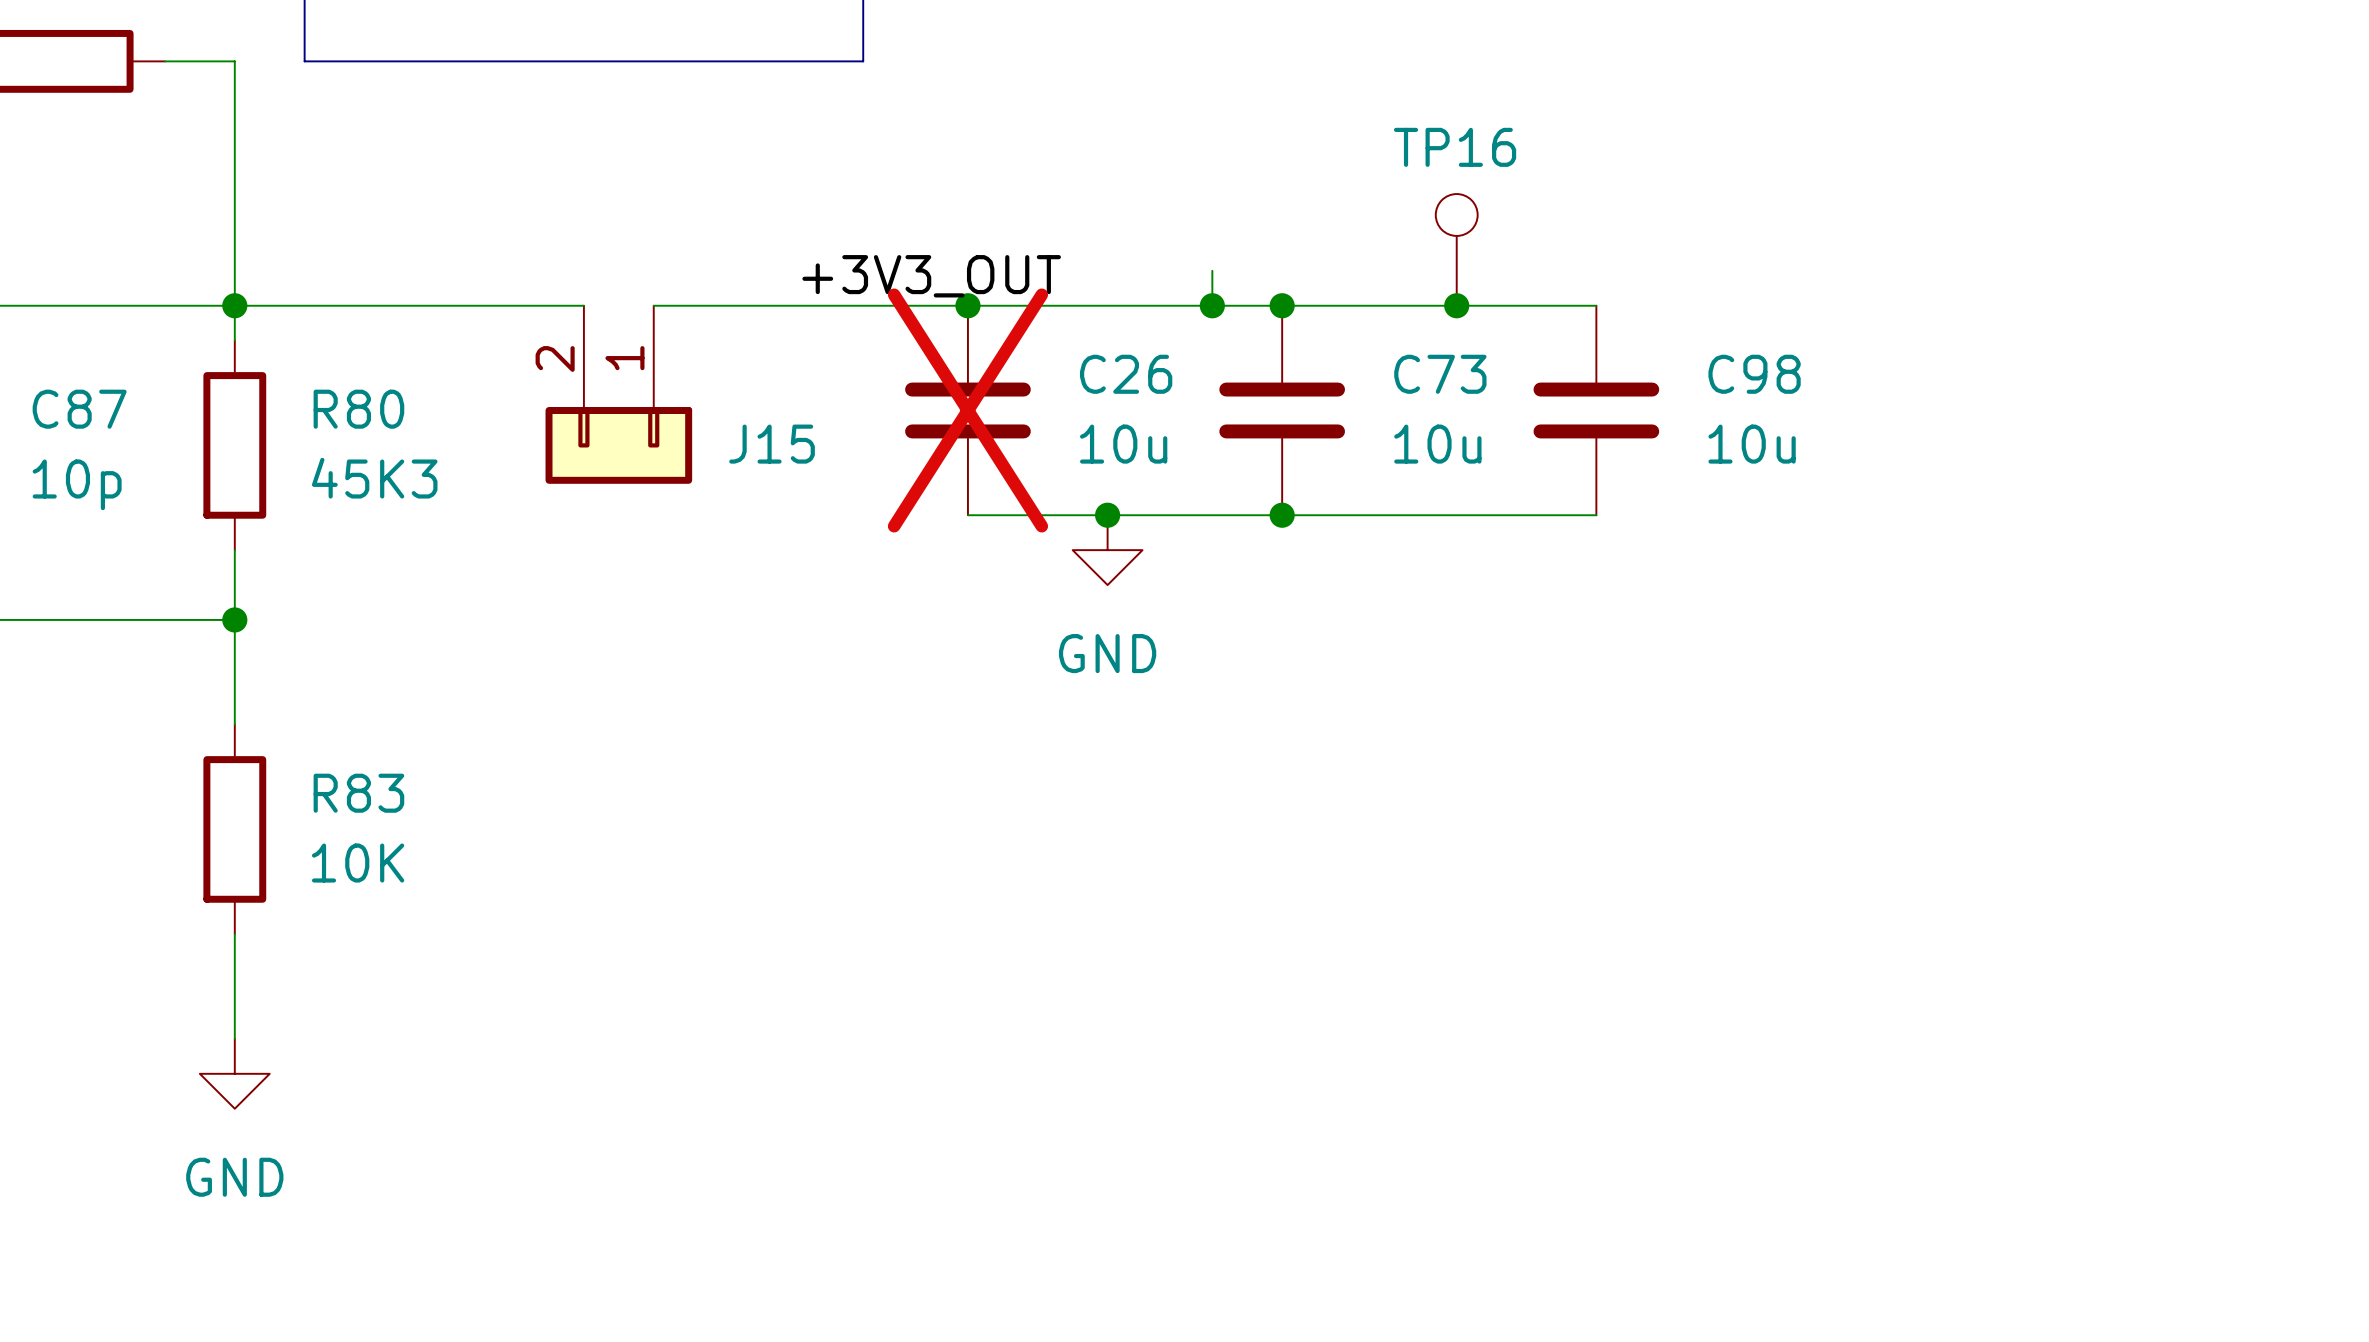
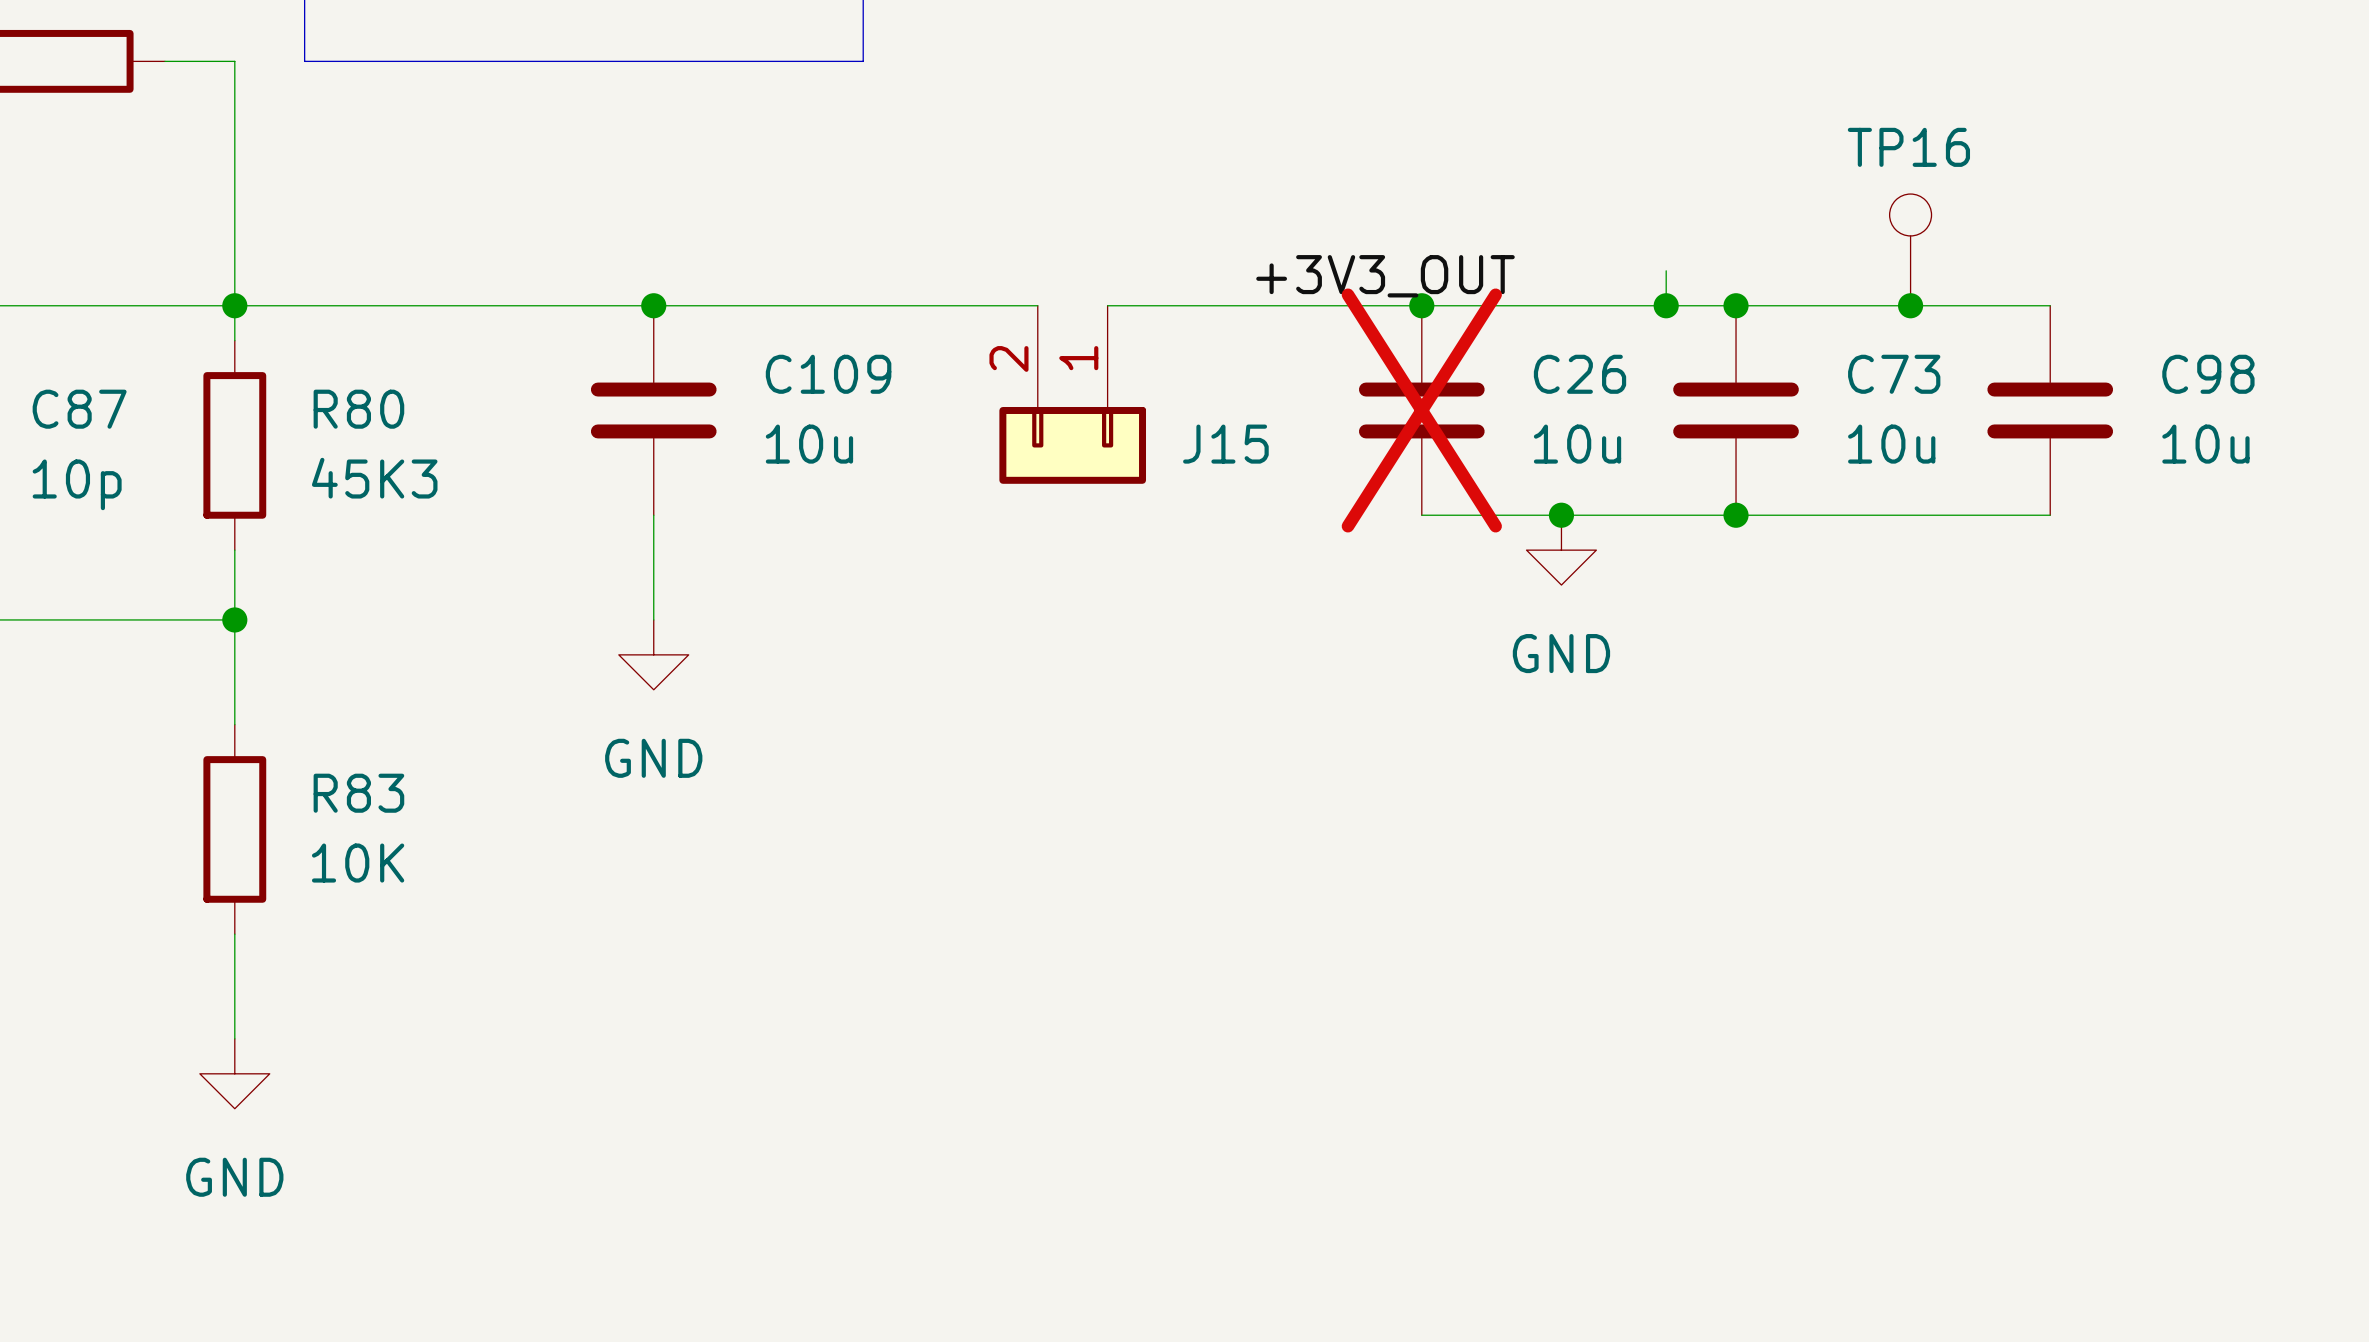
TP16 position: (1456, 249) -> (1910, 249)
wire: (1212, 270) (1212, 305) -> (1666, 270) (1666, 305)
label position: +3V3_OUT (931, 276) -> +3V3_OUT (1385, 276)
junction: none -> (653, 305)
junction: (967, 305) -> none
wire: (1037, 305) (1107, 305) -> (583, 305) (653, 305)
junction: (1212, 305) -> none
junction: (1282, 305) -> none
junction position: (1456, 305) -> (1421, 305)
wire: none -> (1596, 305) (2050, 305)
junction: none -> (1666, 305)
junction: none -> (1736, 305)
junction: none -> (1910, 305)
J15 position: (618, 394) -> (1072, 394)
C109: none -> 10u (653, 410)
C26 position: (967, 410) -> (1421, 410)
C73 position: (1282, 410) -> (1736, 410)
C98 position: (1596, 410) -> (2050, 410)
wire: none -> (653, 515) (653, 619)
wire: (967, 515) (1421, 515) -> (1596, 515) (2050, 515)
junction: (1107, 515) -> none
junction: (1282, 515) -> none
junction: none -> (1561, 515)
junction: none -> (1736, 515)
power symbol: GND (1107, 550) -> none
power symbol: none -> GND (1561, 550)
power symbol: none -> GND (653, 654)

